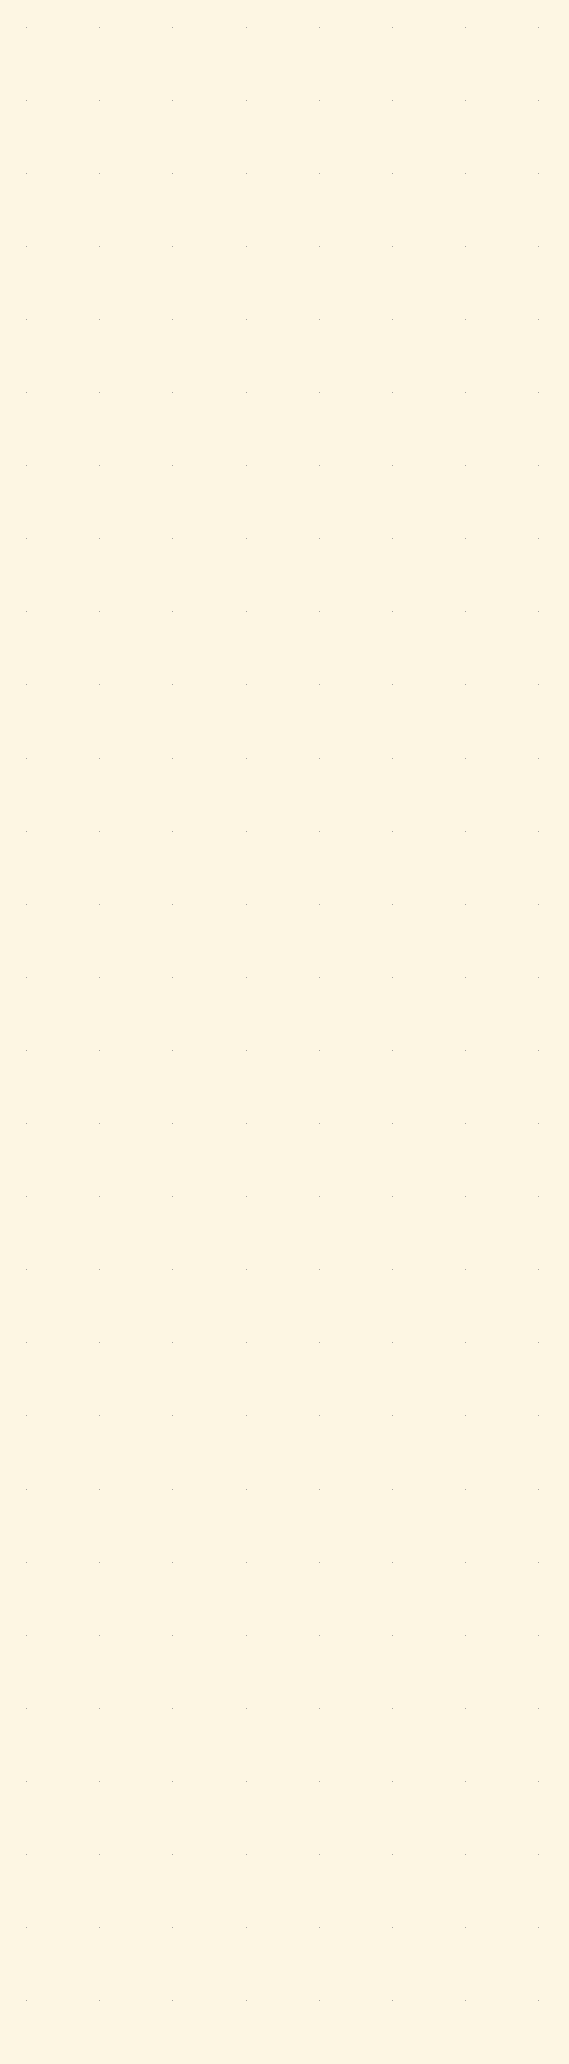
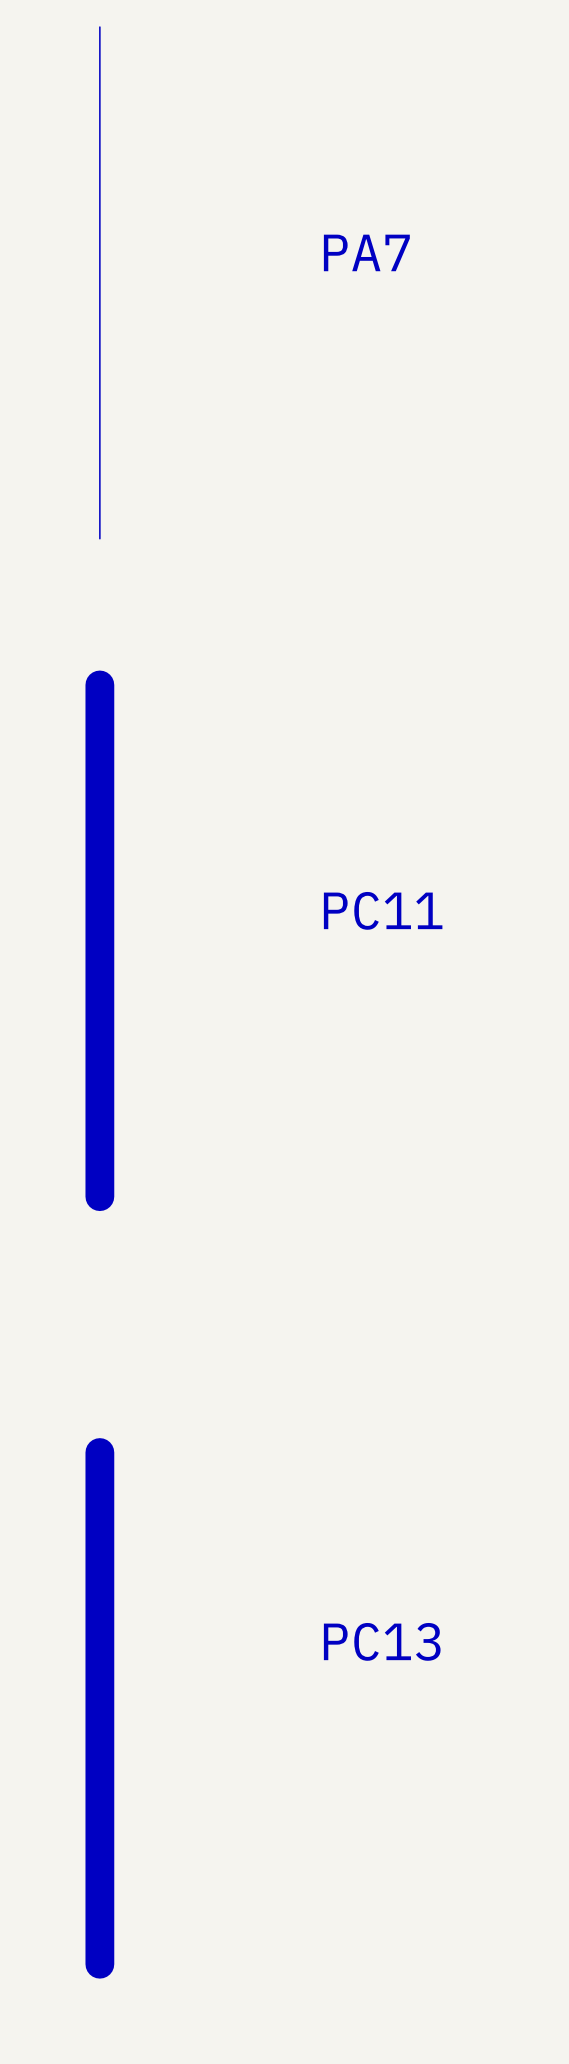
line: none -> (99, 27) (99, 538)
text: none -> PA7 (366, 252)
line: none -> (99, 684) (99, 1196)
text: none -> PC11 (383, 910)
line: none -> (99, 1452) (99, 1964)
text: none -> PC13 (382, 1641)

